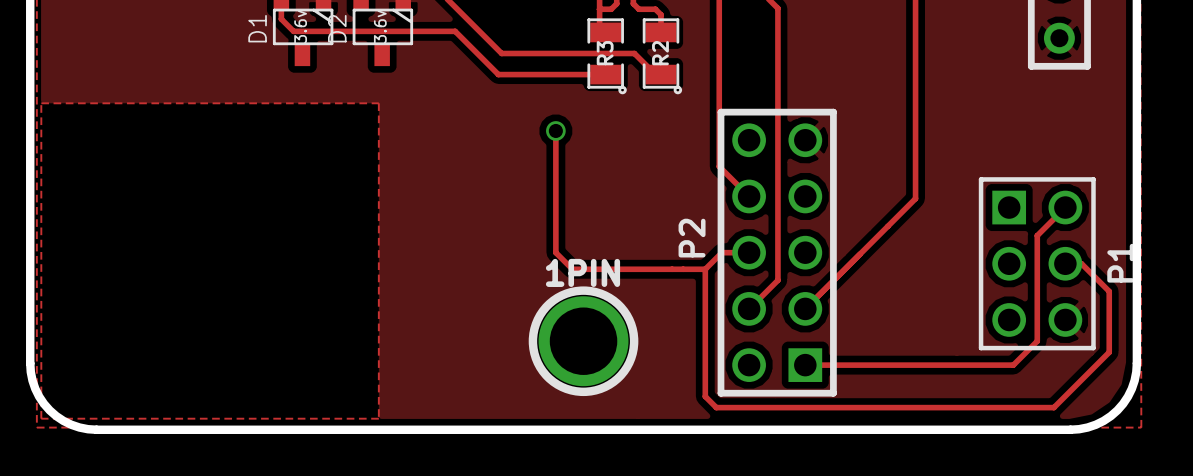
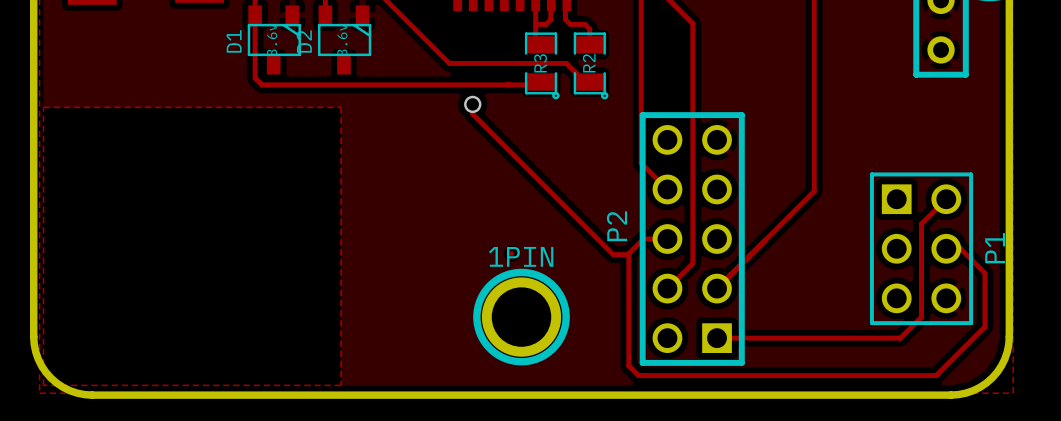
track: (281, 19) (293, 31) (455, 31) (498, 74) (600, 74) -> (255, 33) (255, 77) (262, 84) (538, 84) (541, 82)
track: none -> (472, 104) (472, 114) (613, 254) (628, 254)
track: (555, 130) (555, 252) (572, 269) (705, 269) -> none
via position: (555, 130) -> (472, 104)

